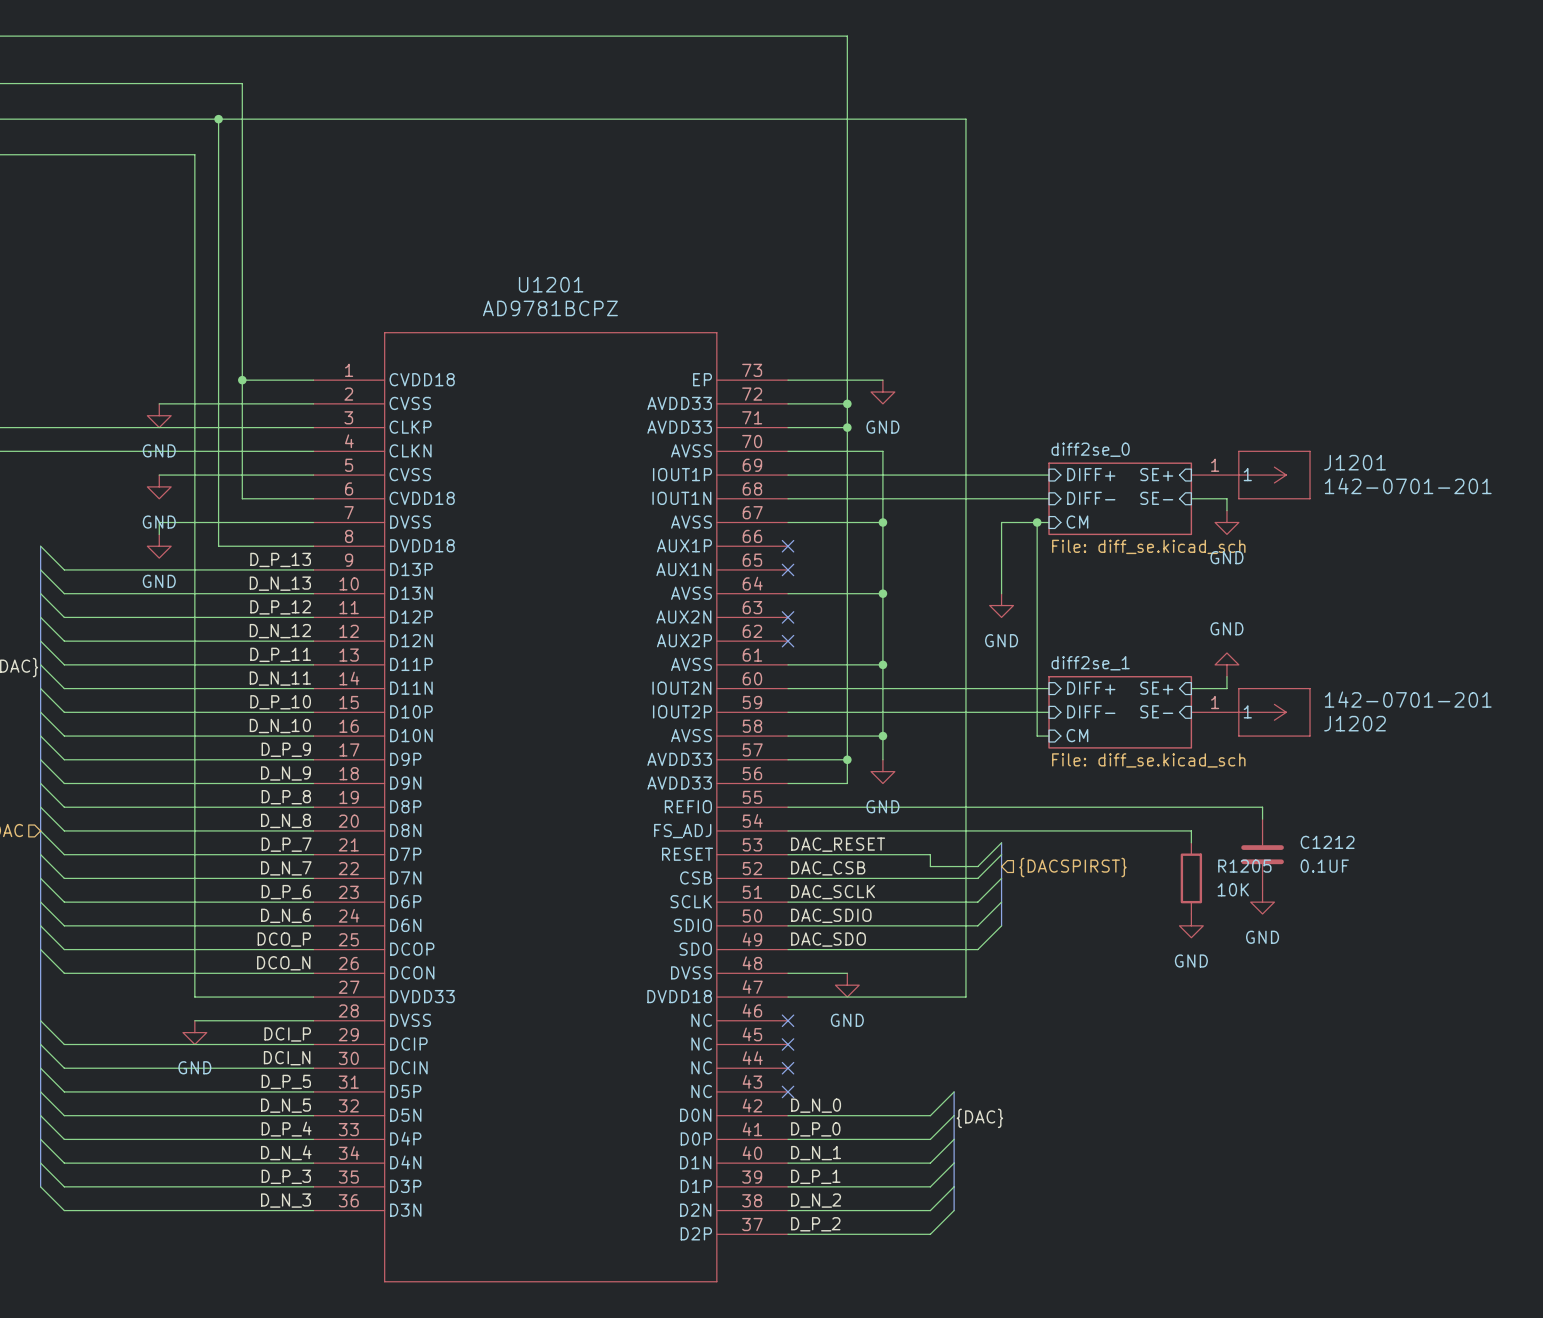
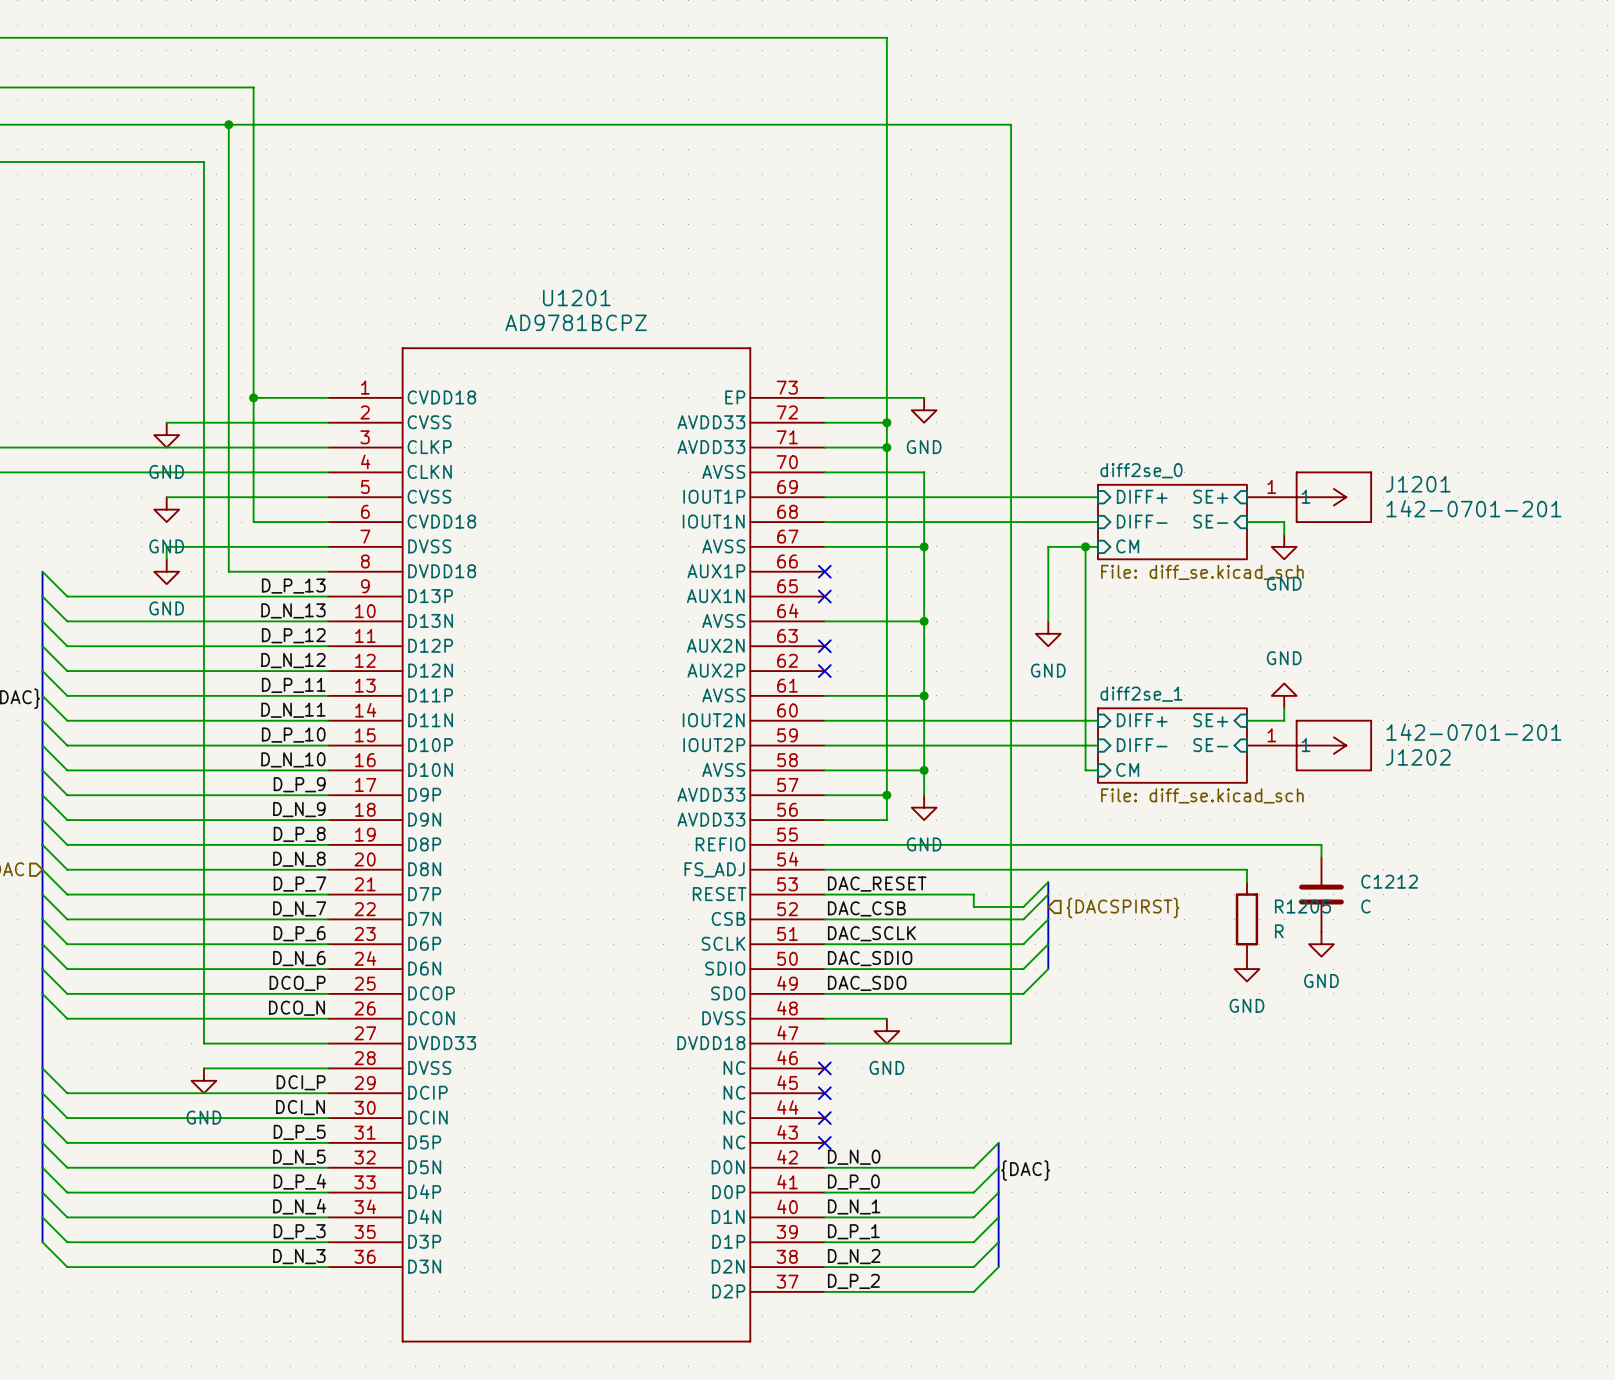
C1212 value: 0.1UF (1324, 866) -> C (1365, 906)
R1205 value: 10K (1233, 889) -> R (1279, 931)

